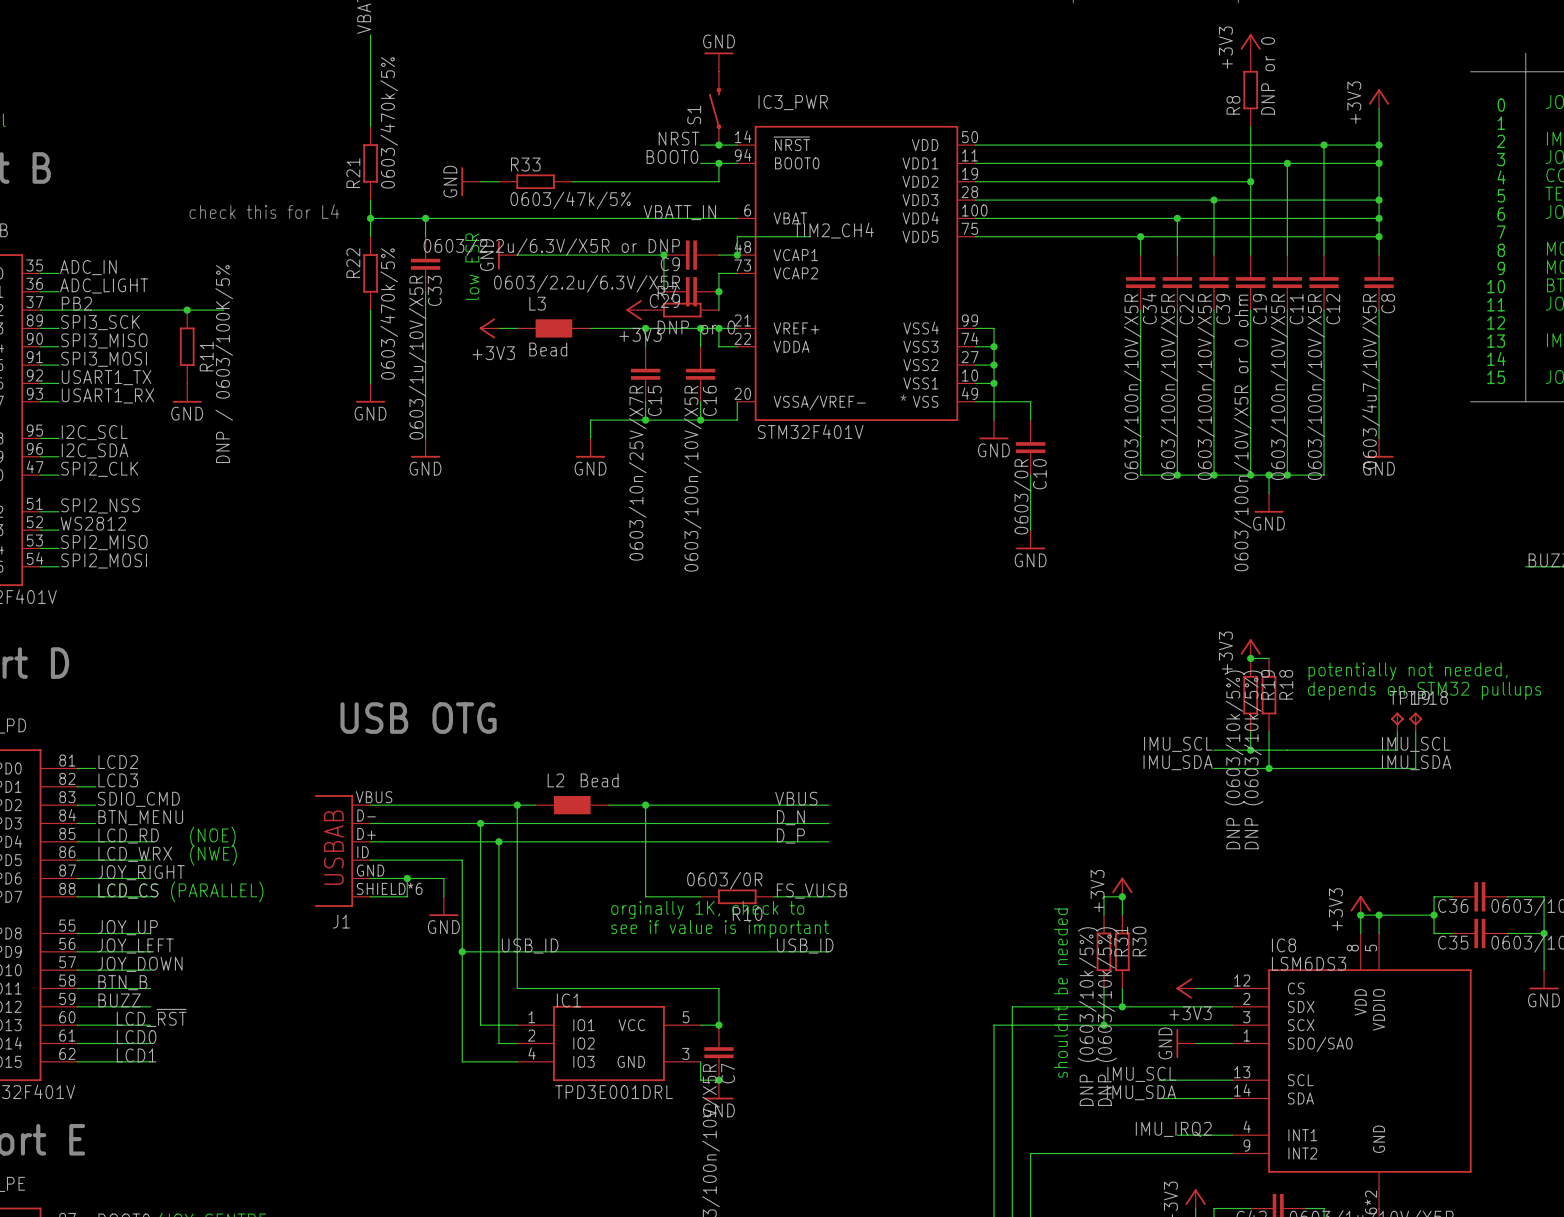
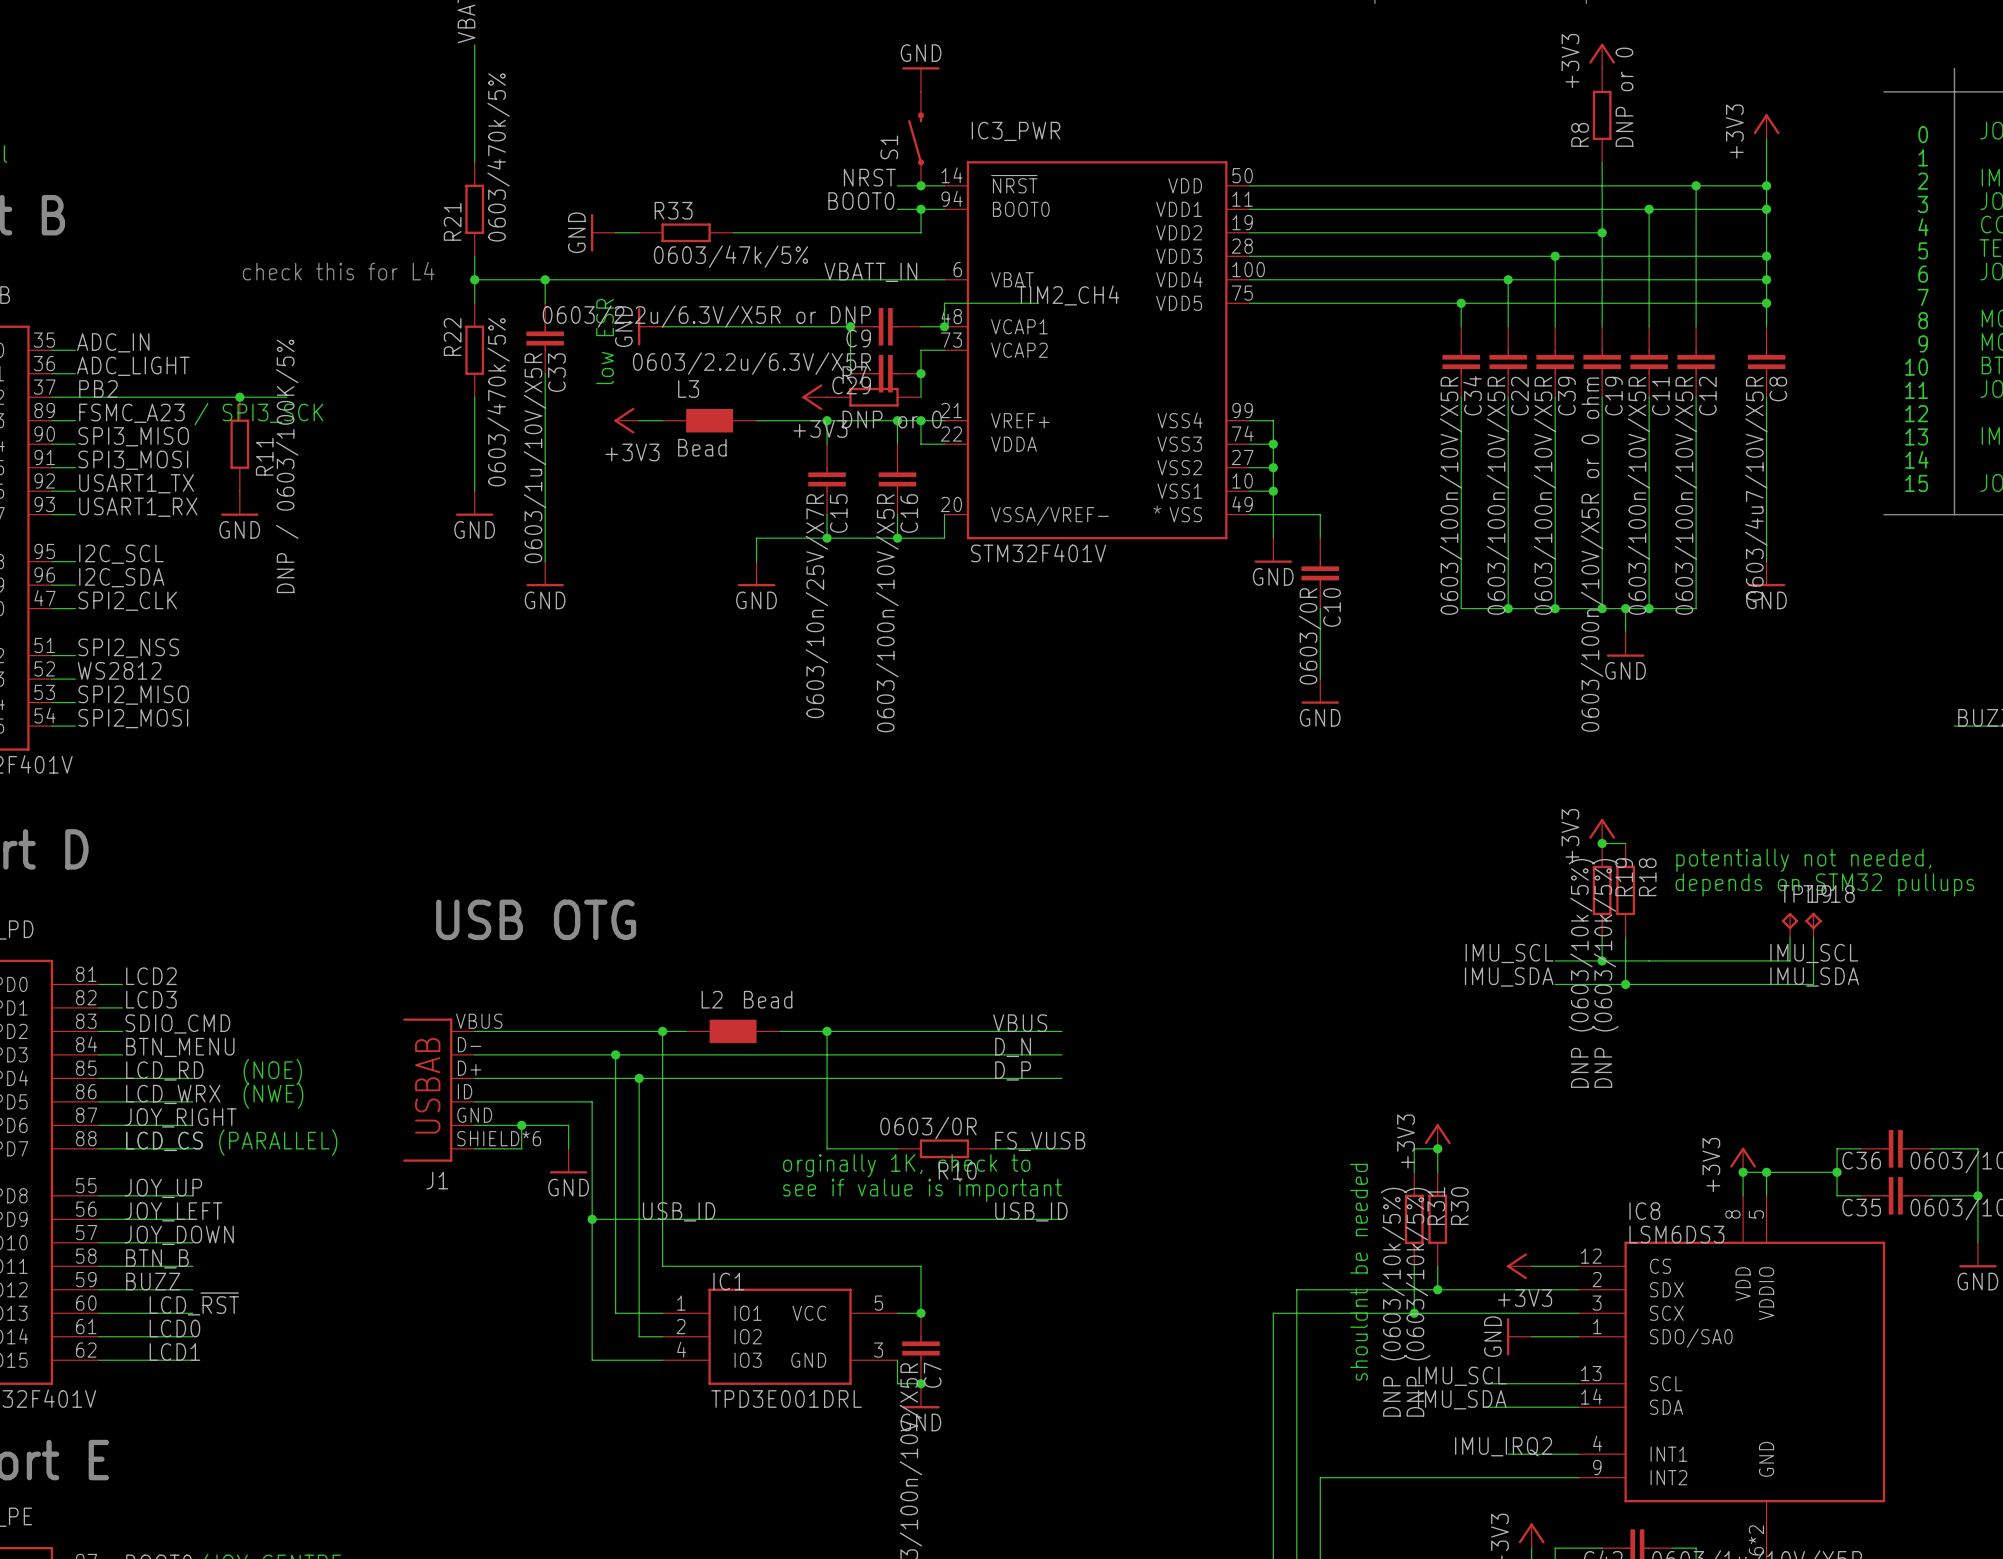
label: SPI3_SCK (100, 322) -> FSMC_A23 (131, 413)
text: none -> / SPI3_SCK (258, 414)

